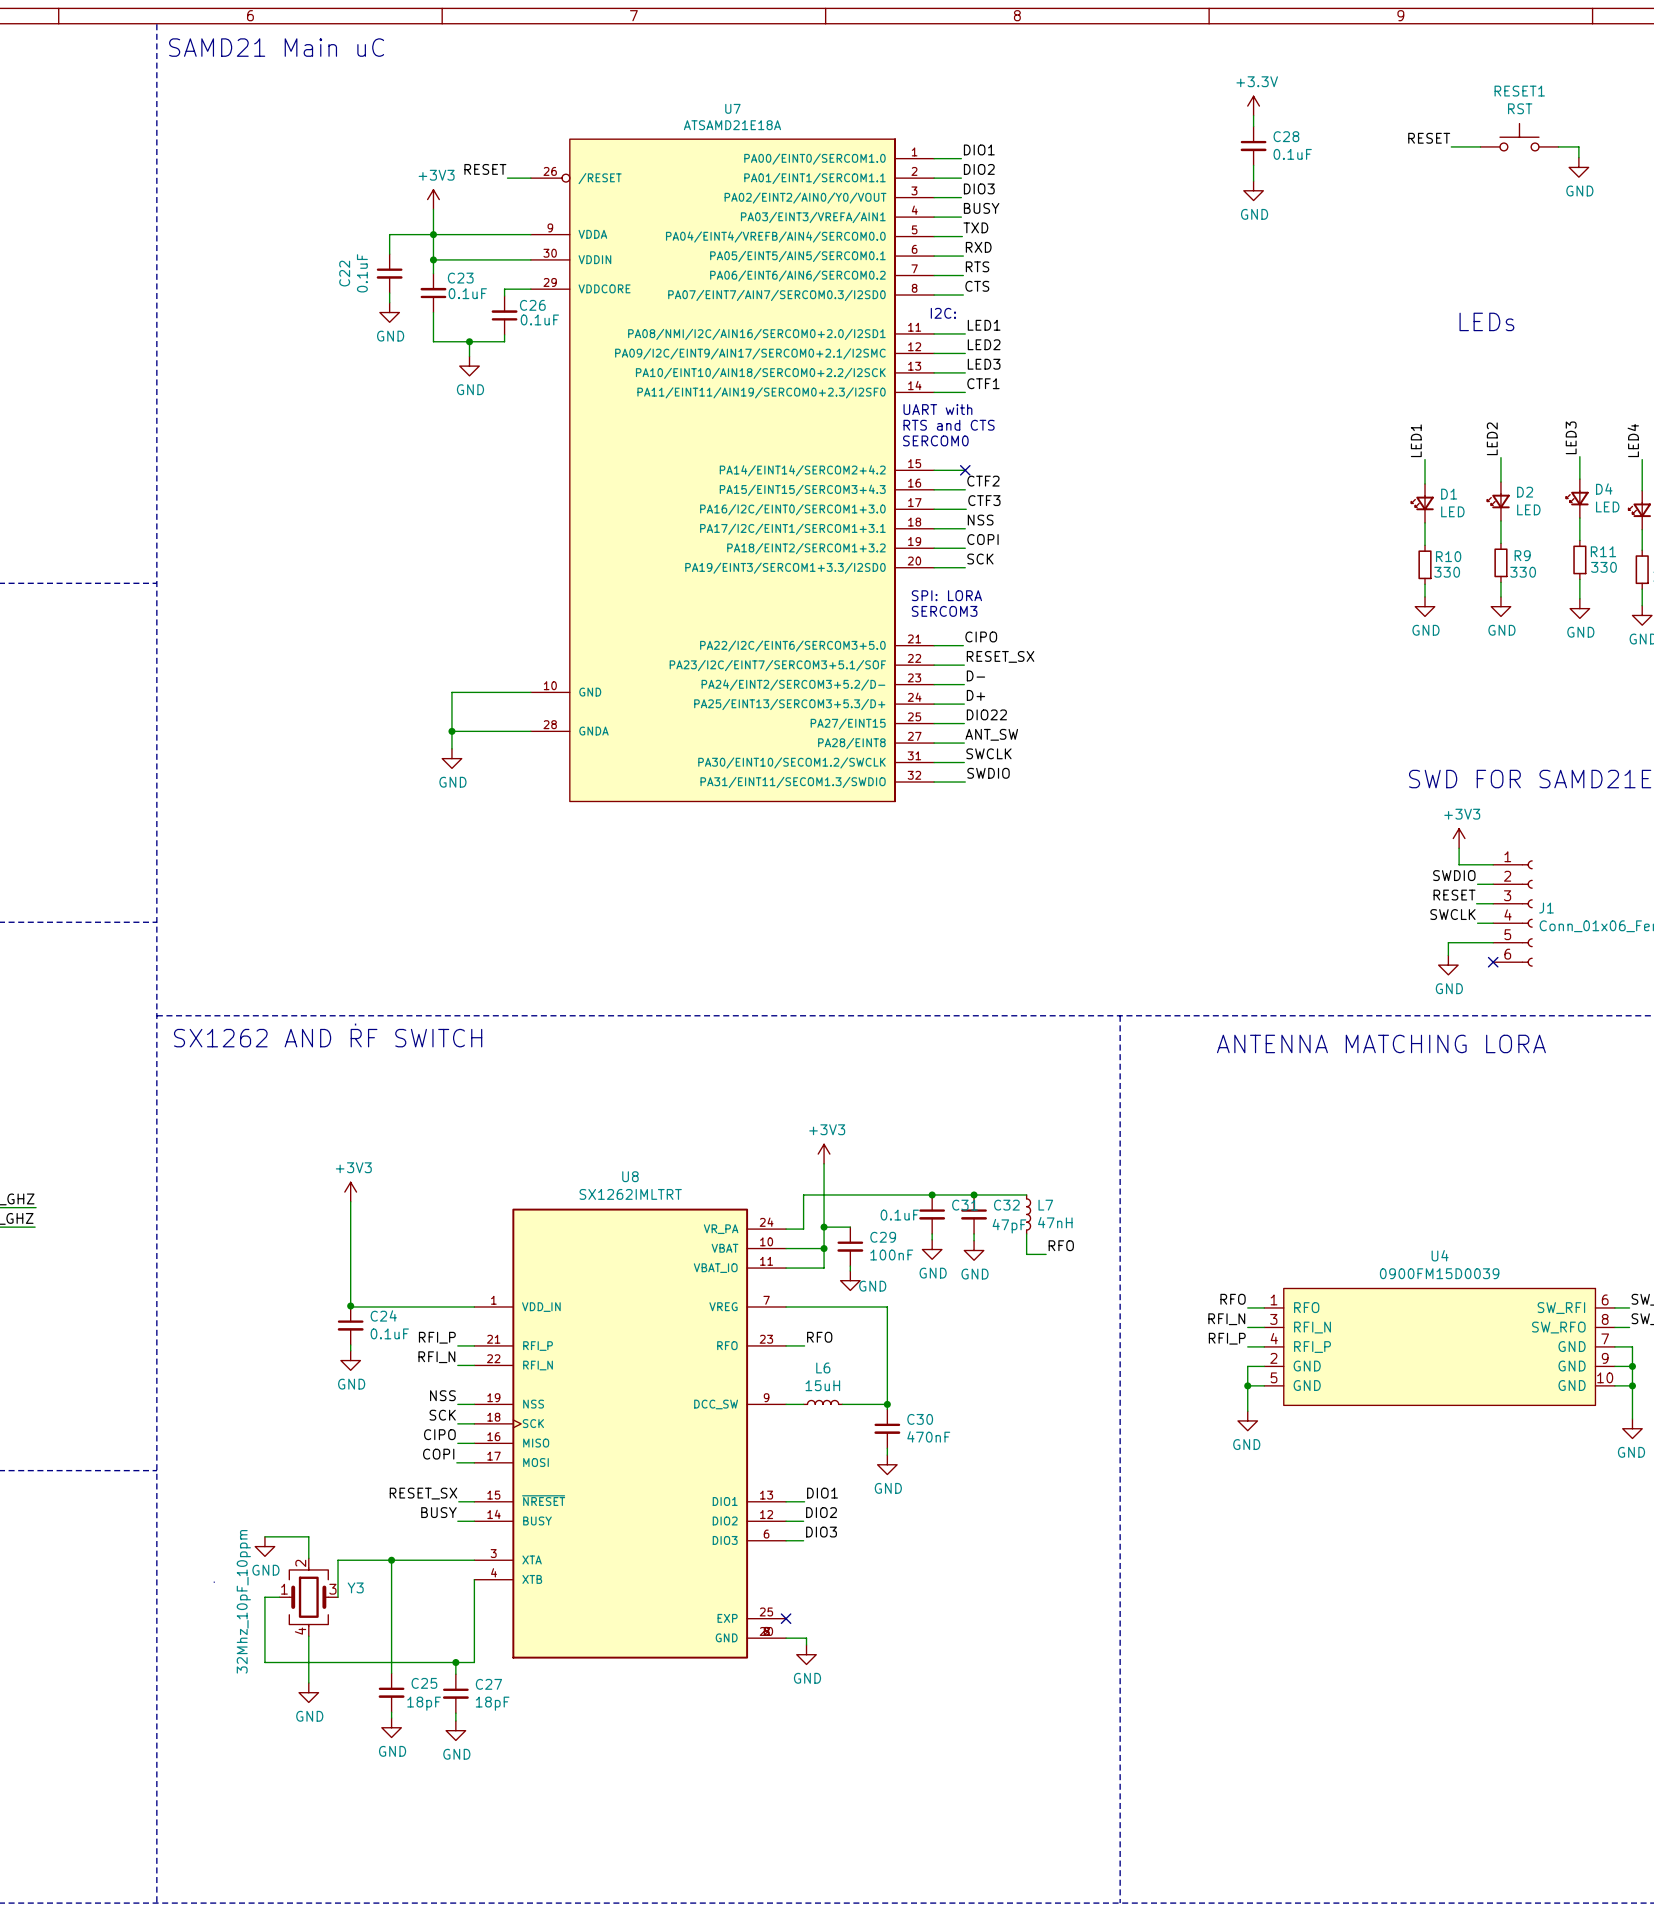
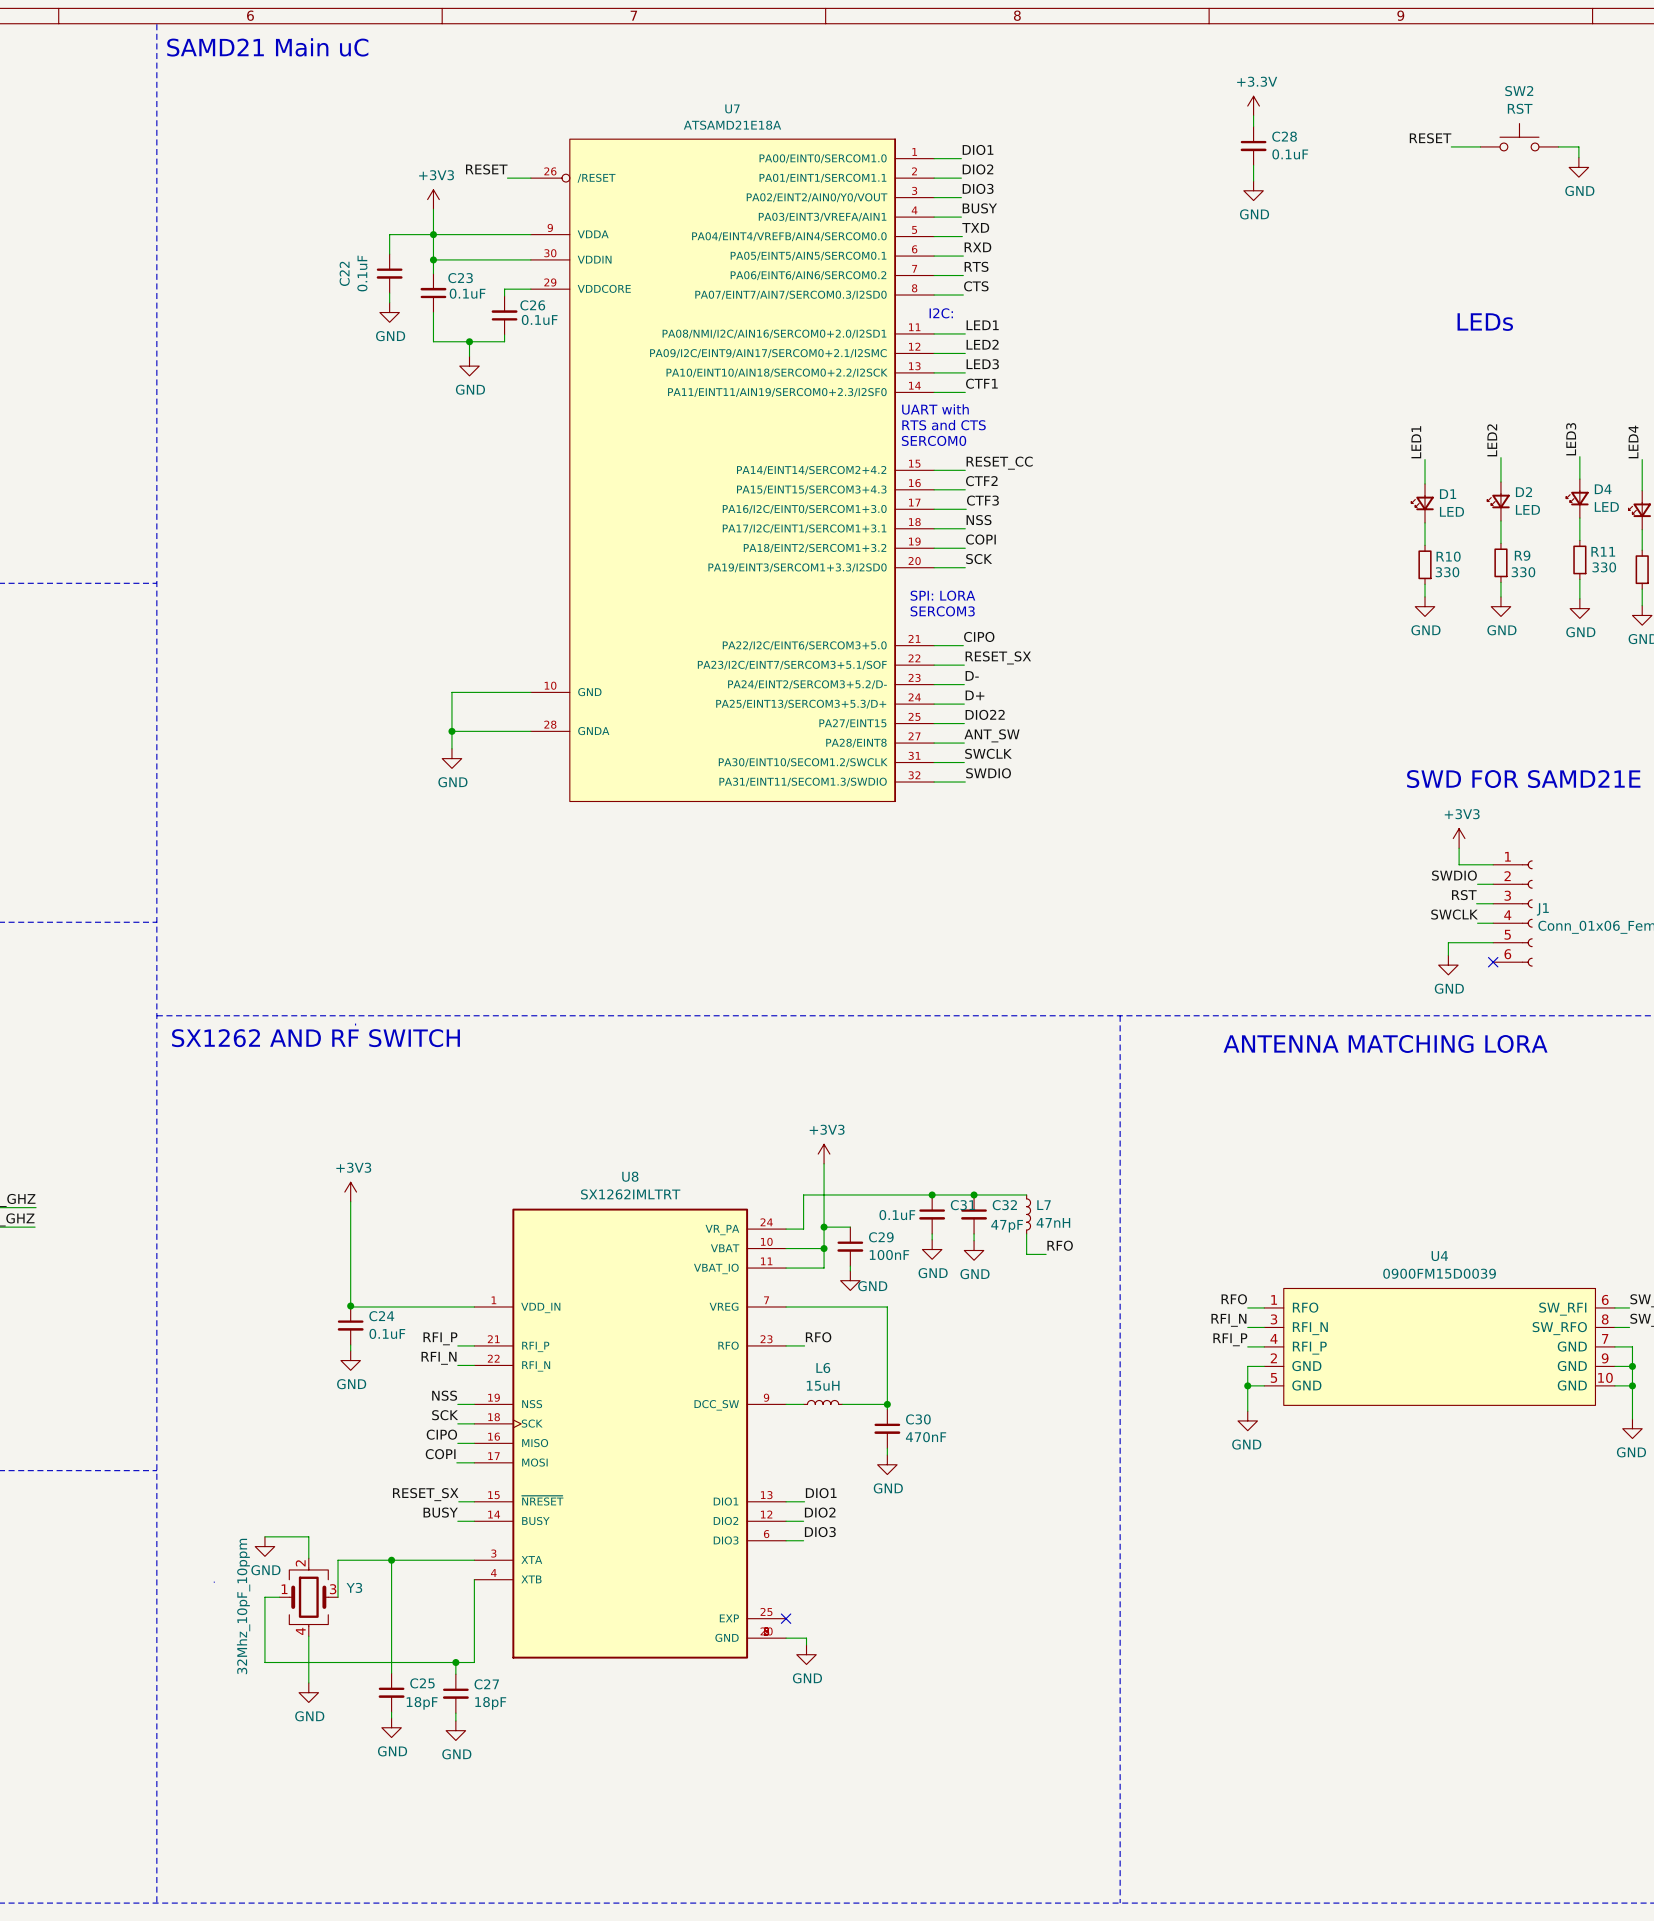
RESET1 name: RESET1 (1519, 91) -> SW2 (1519, 91)
label: none -> RESET_CC (999, 463)
no-connect mark: (965, 470) -> none
label: RESET (1454, 895) -> RST (1464, 895)

